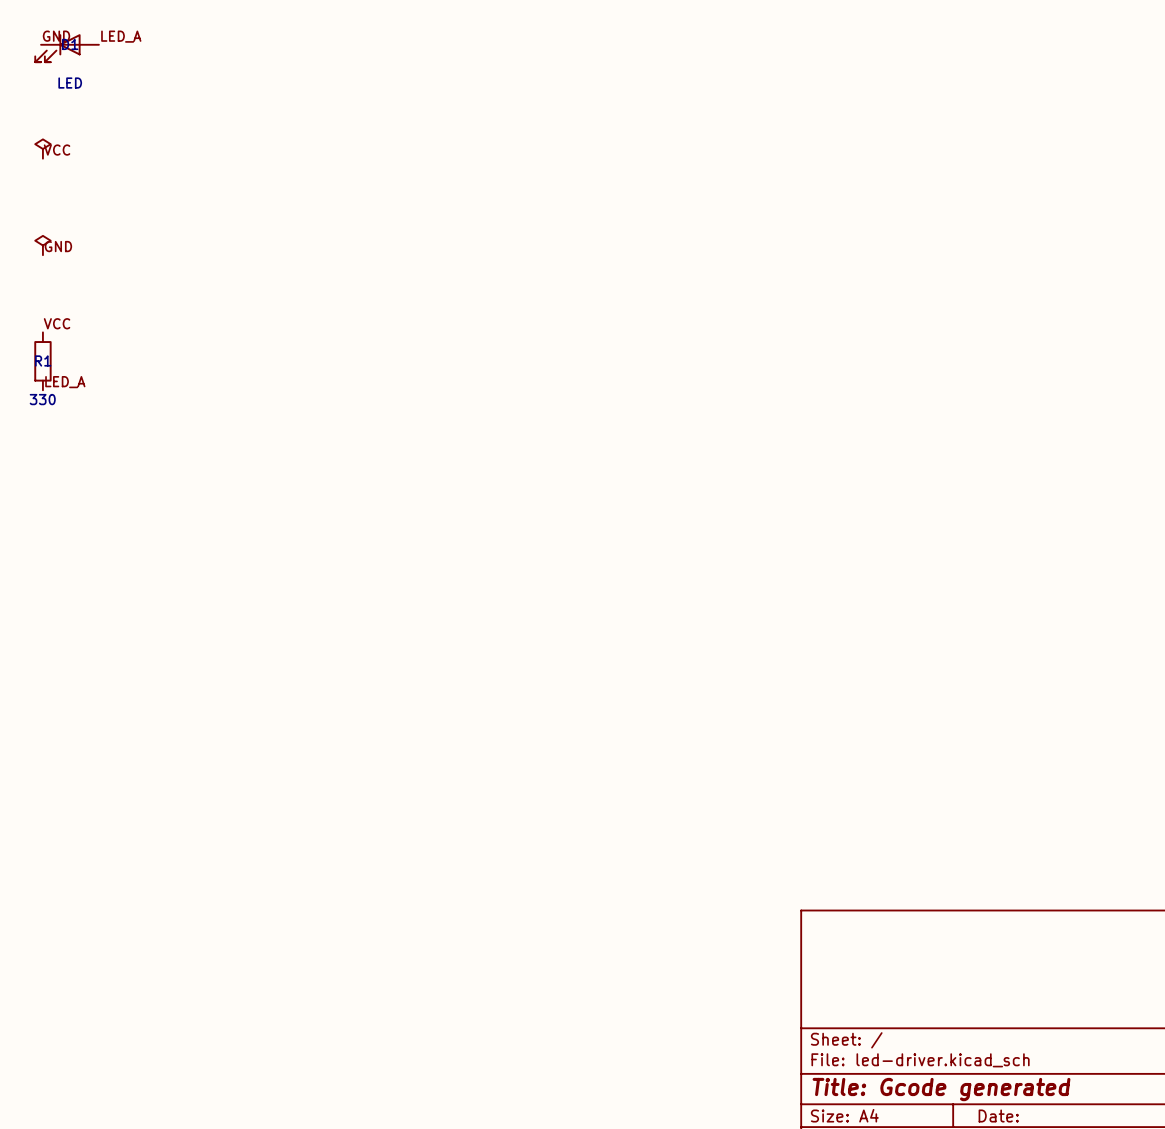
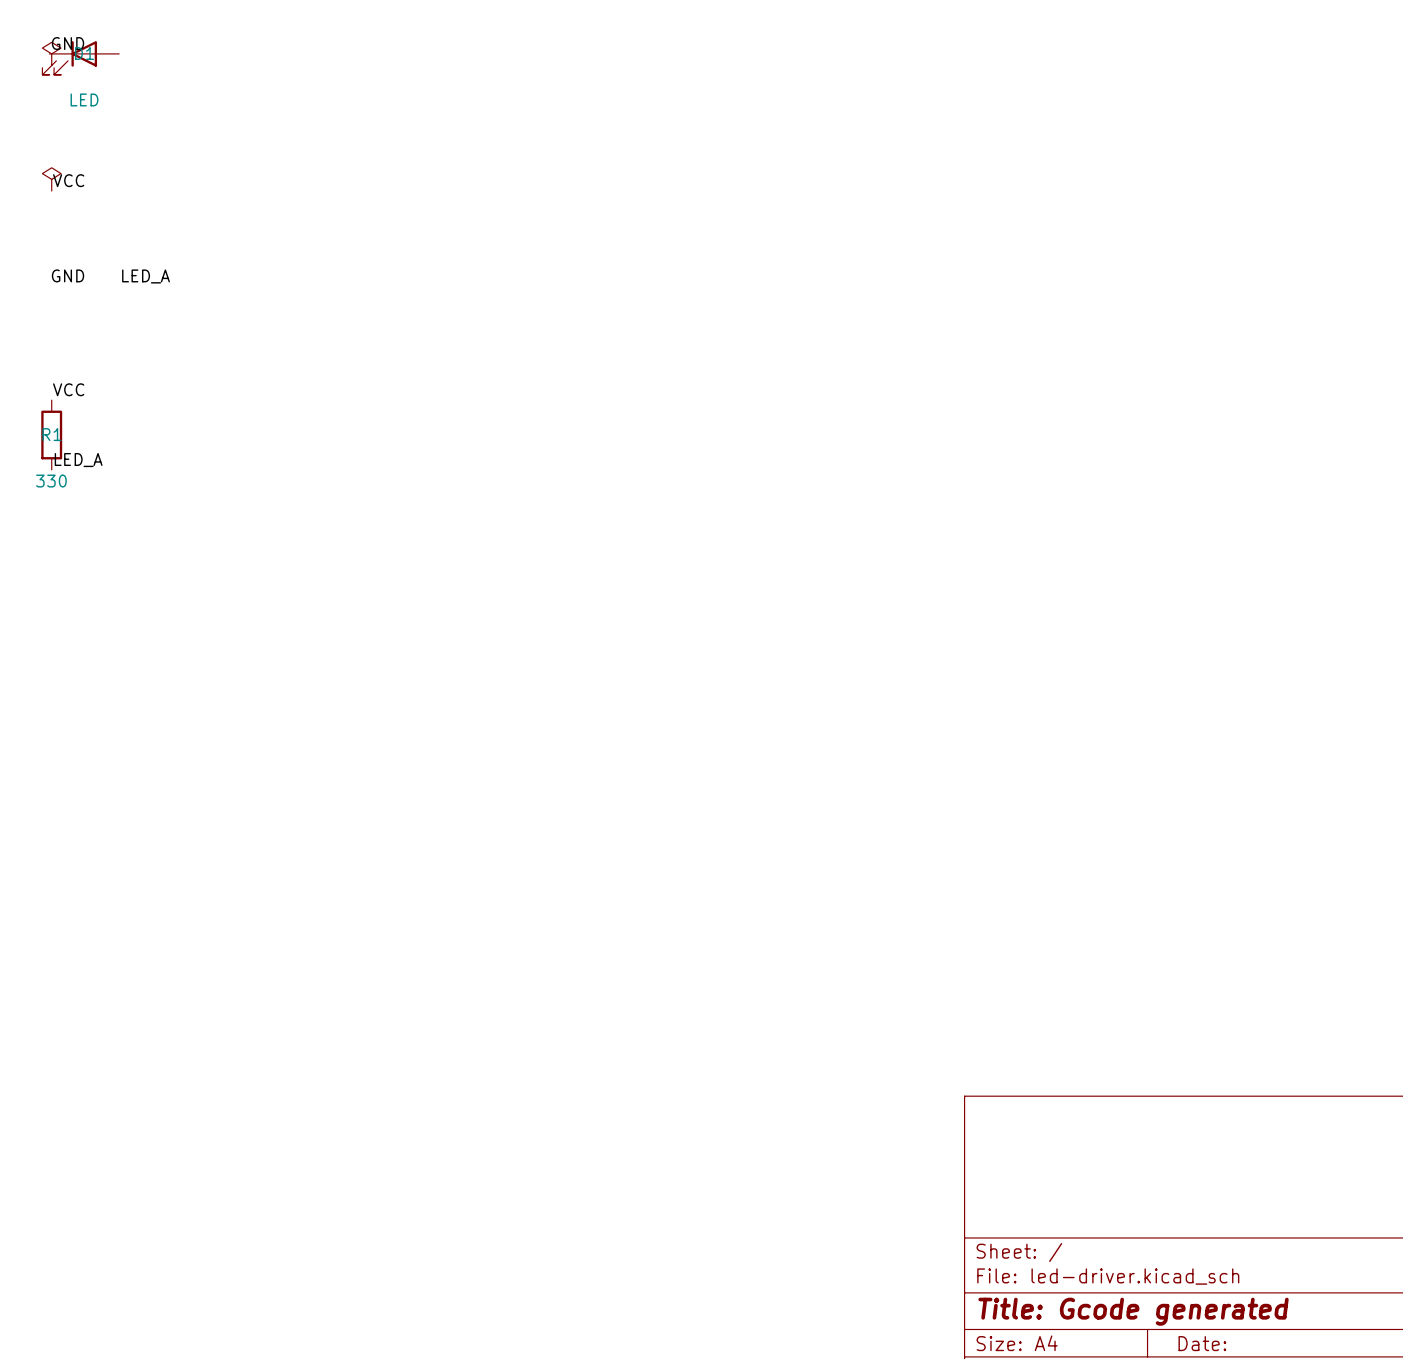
label: LED_A (121, 36) -> none
power symbol: none -> (51, 53)
label: none -> LED_A (146, 276)
power symbol: (42, 245) -> none
label position: GND (58, 246) -> GND (68, 275)

